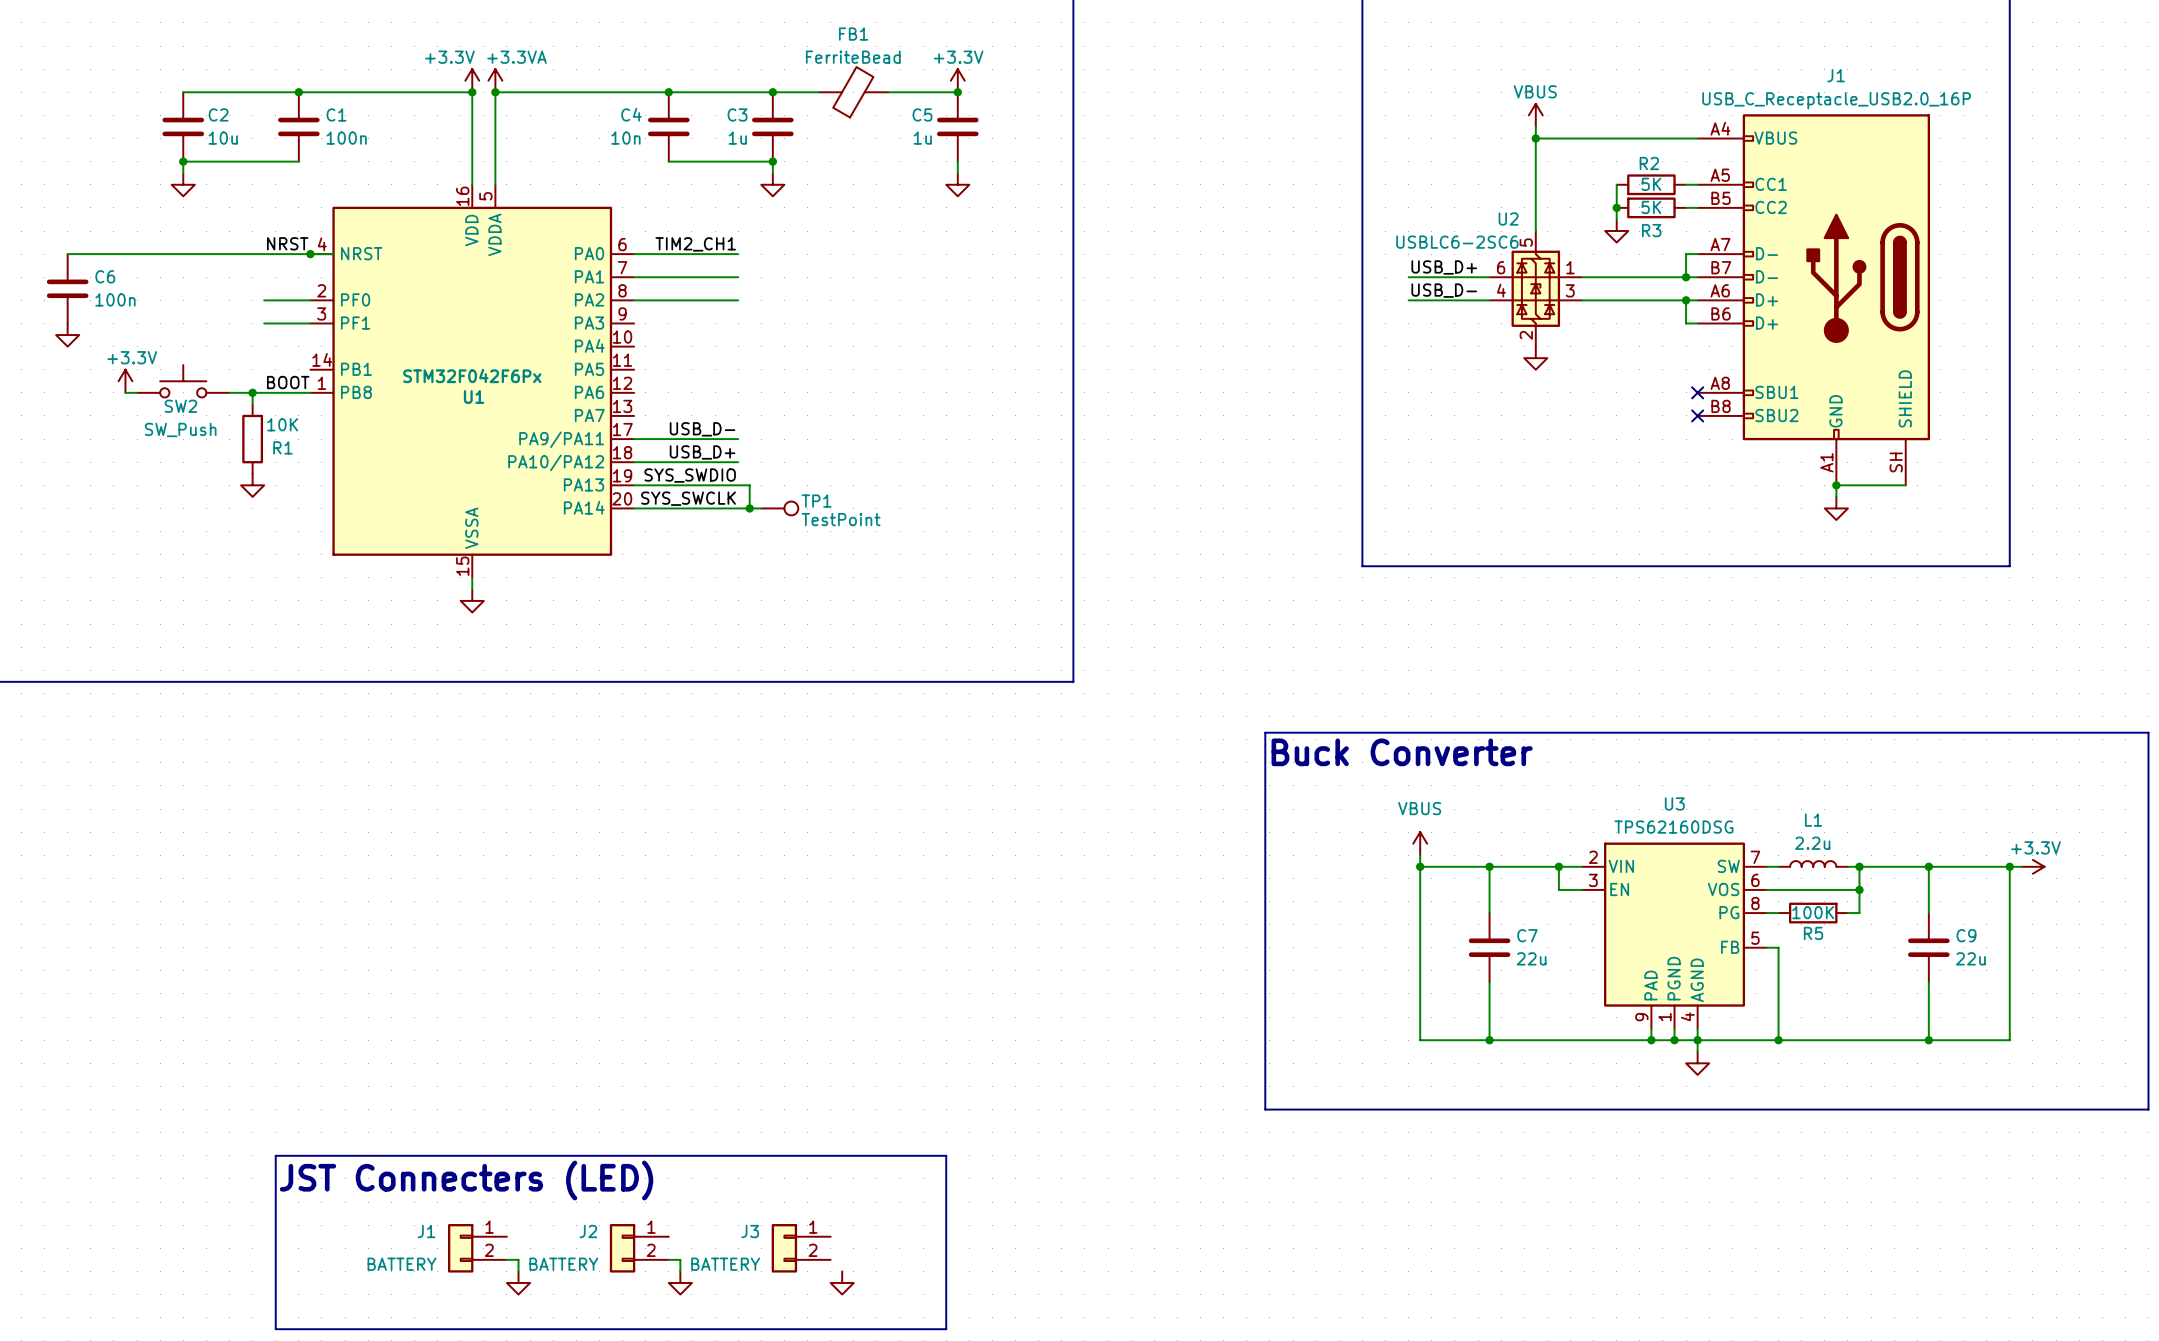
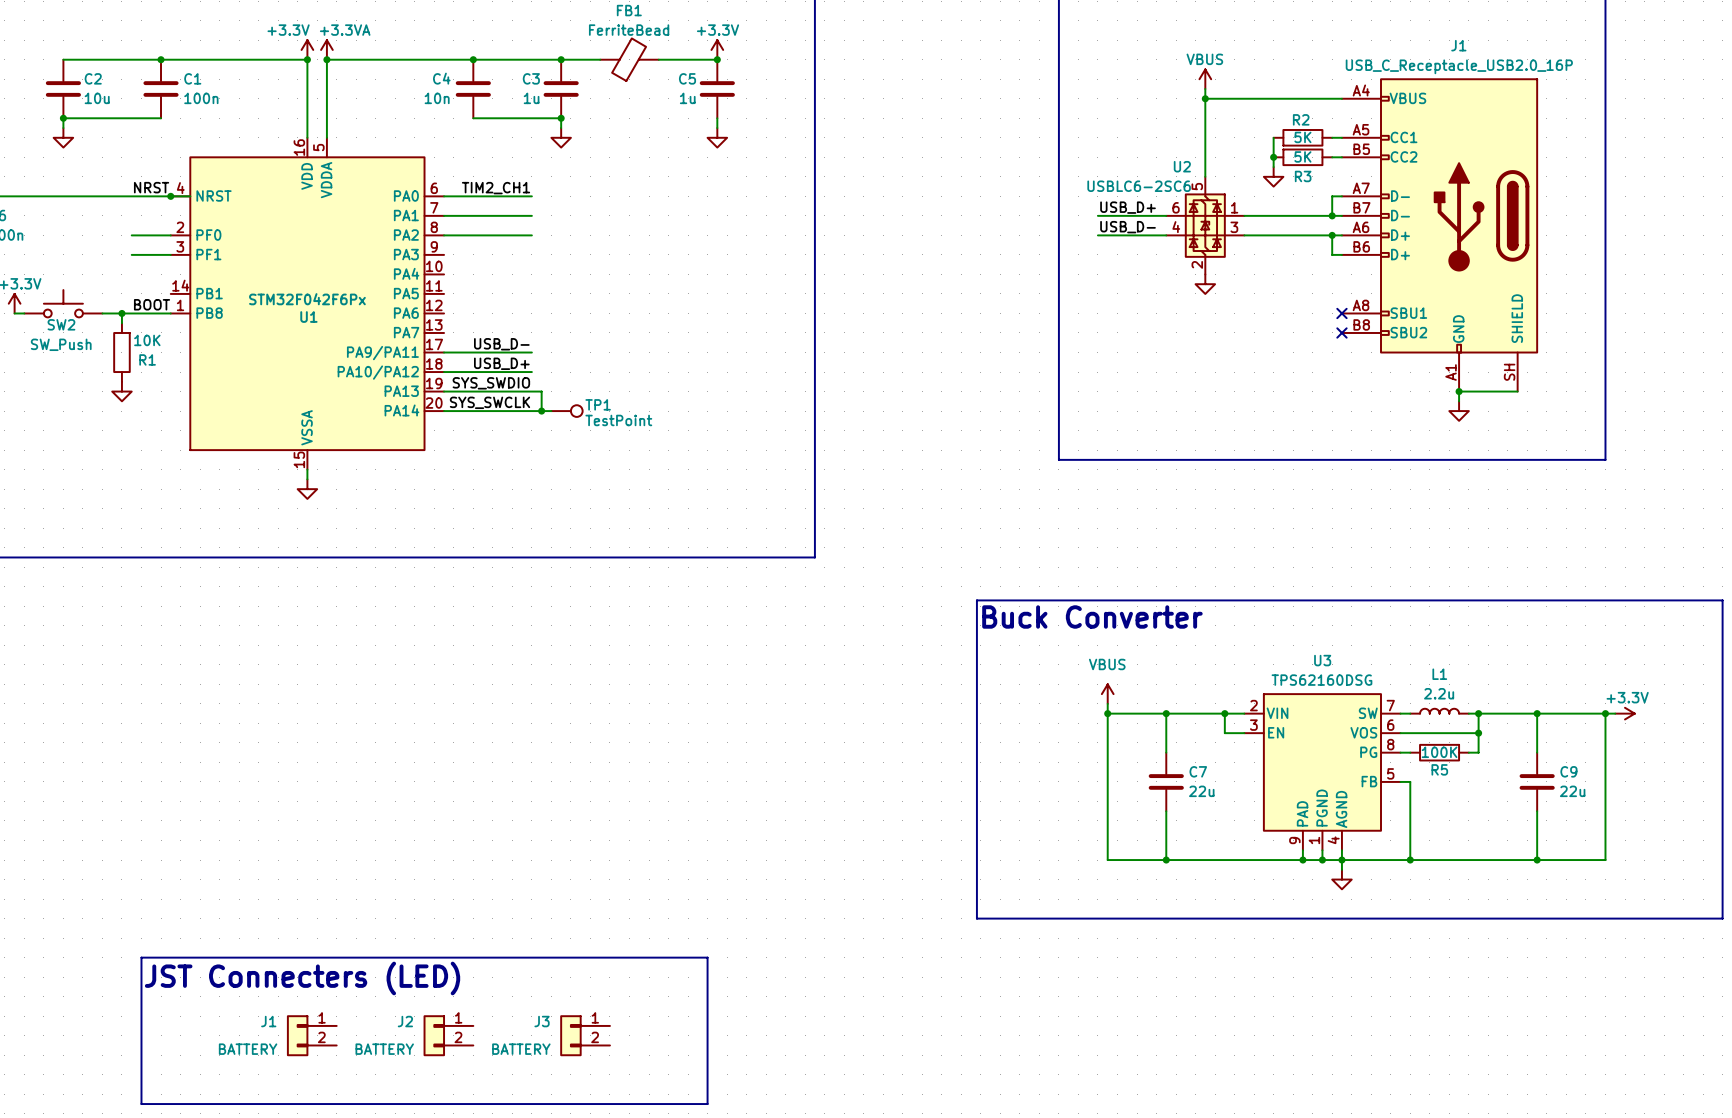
wire: (506, 1259) (518, 1259) (518, 1271) -> none
wire: (668, 1259) (680, 1259) (680, 1271) -> none
power symbol: (518, 1282) -> none
power symbol: (680, 1282) -> none
power symbol: (842, 1282) -> none

